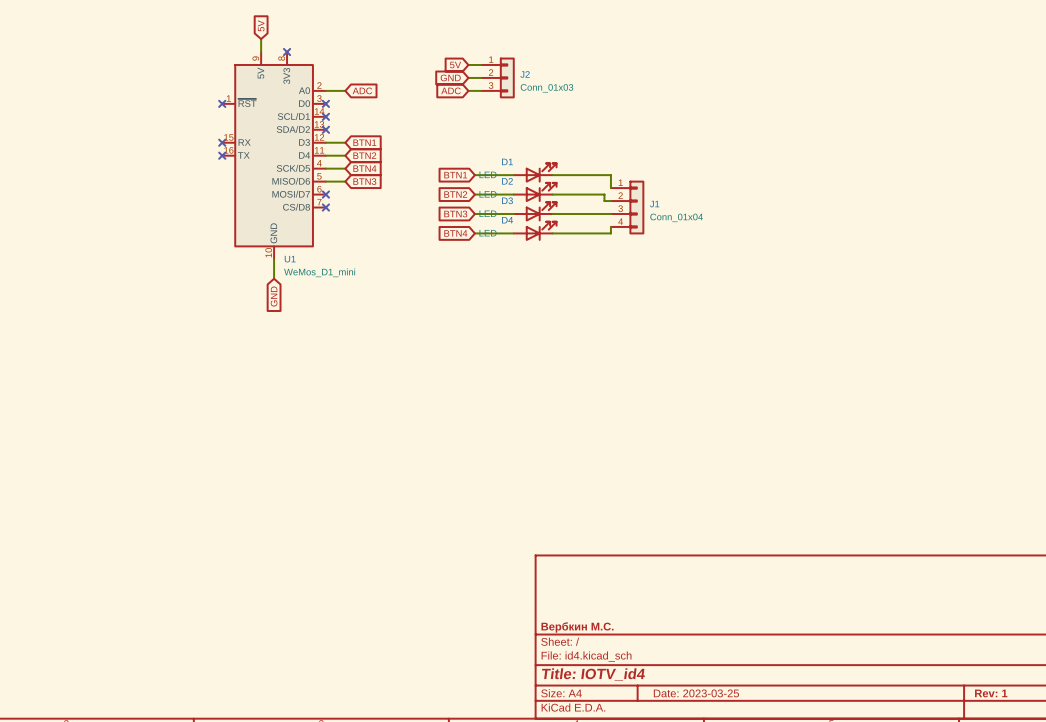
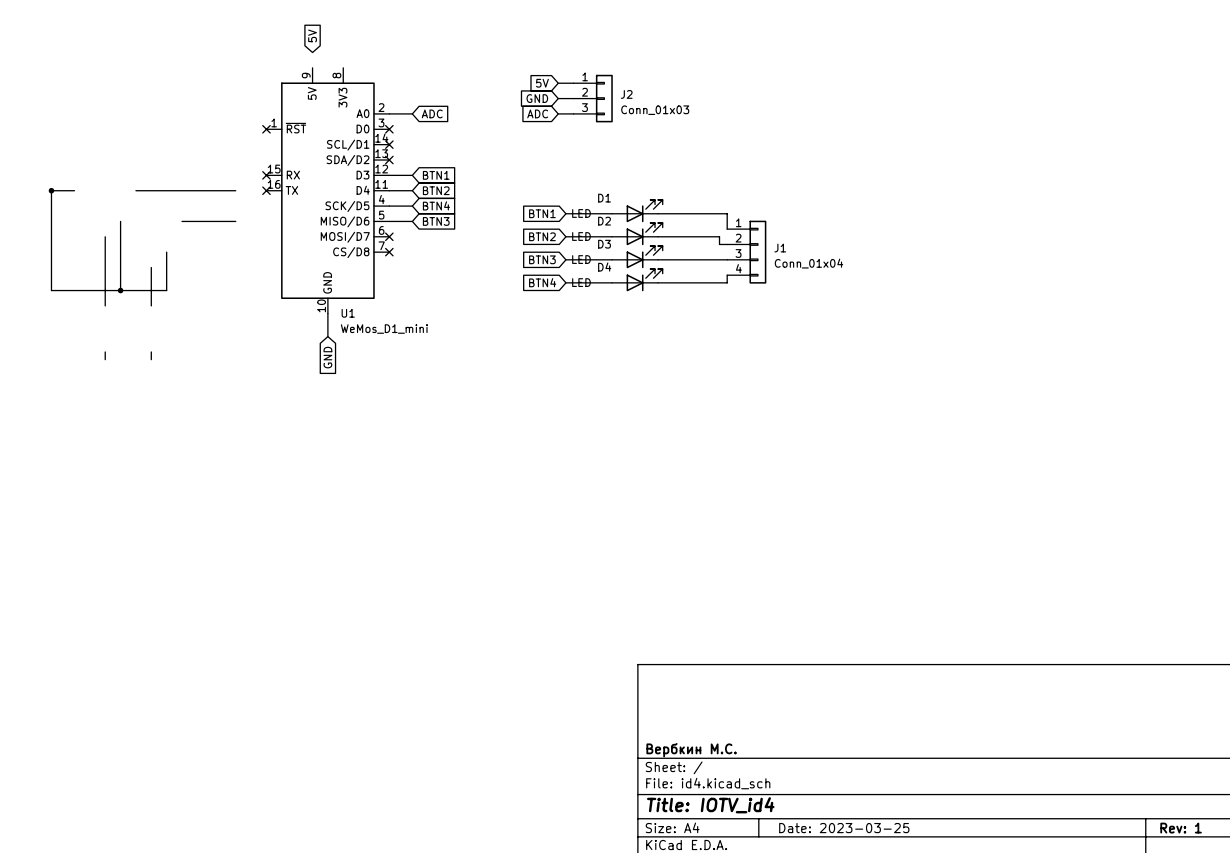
wire: (261, 39) (261, 52) -> none
no-connect mark: (287, 52) -> none
junction: none -> (51, 190)
wire: none -> (74, 190) (51, 190) (51, 290) (166, 290) (166, 252)
wire: none -> (135, 190) (235, 190)
wire: none -> (120, 221) (120, 290)
wire: none -> (182, 221) (235, 221)
wire: none -> (105, 236) (105, 305)
wire: none -> (151, 267) (151, 305)
junction: none -> (120, 290)
wire: none -> (105, 351) (105, 359)
wire: none -> (151, 351) (151, 359)

